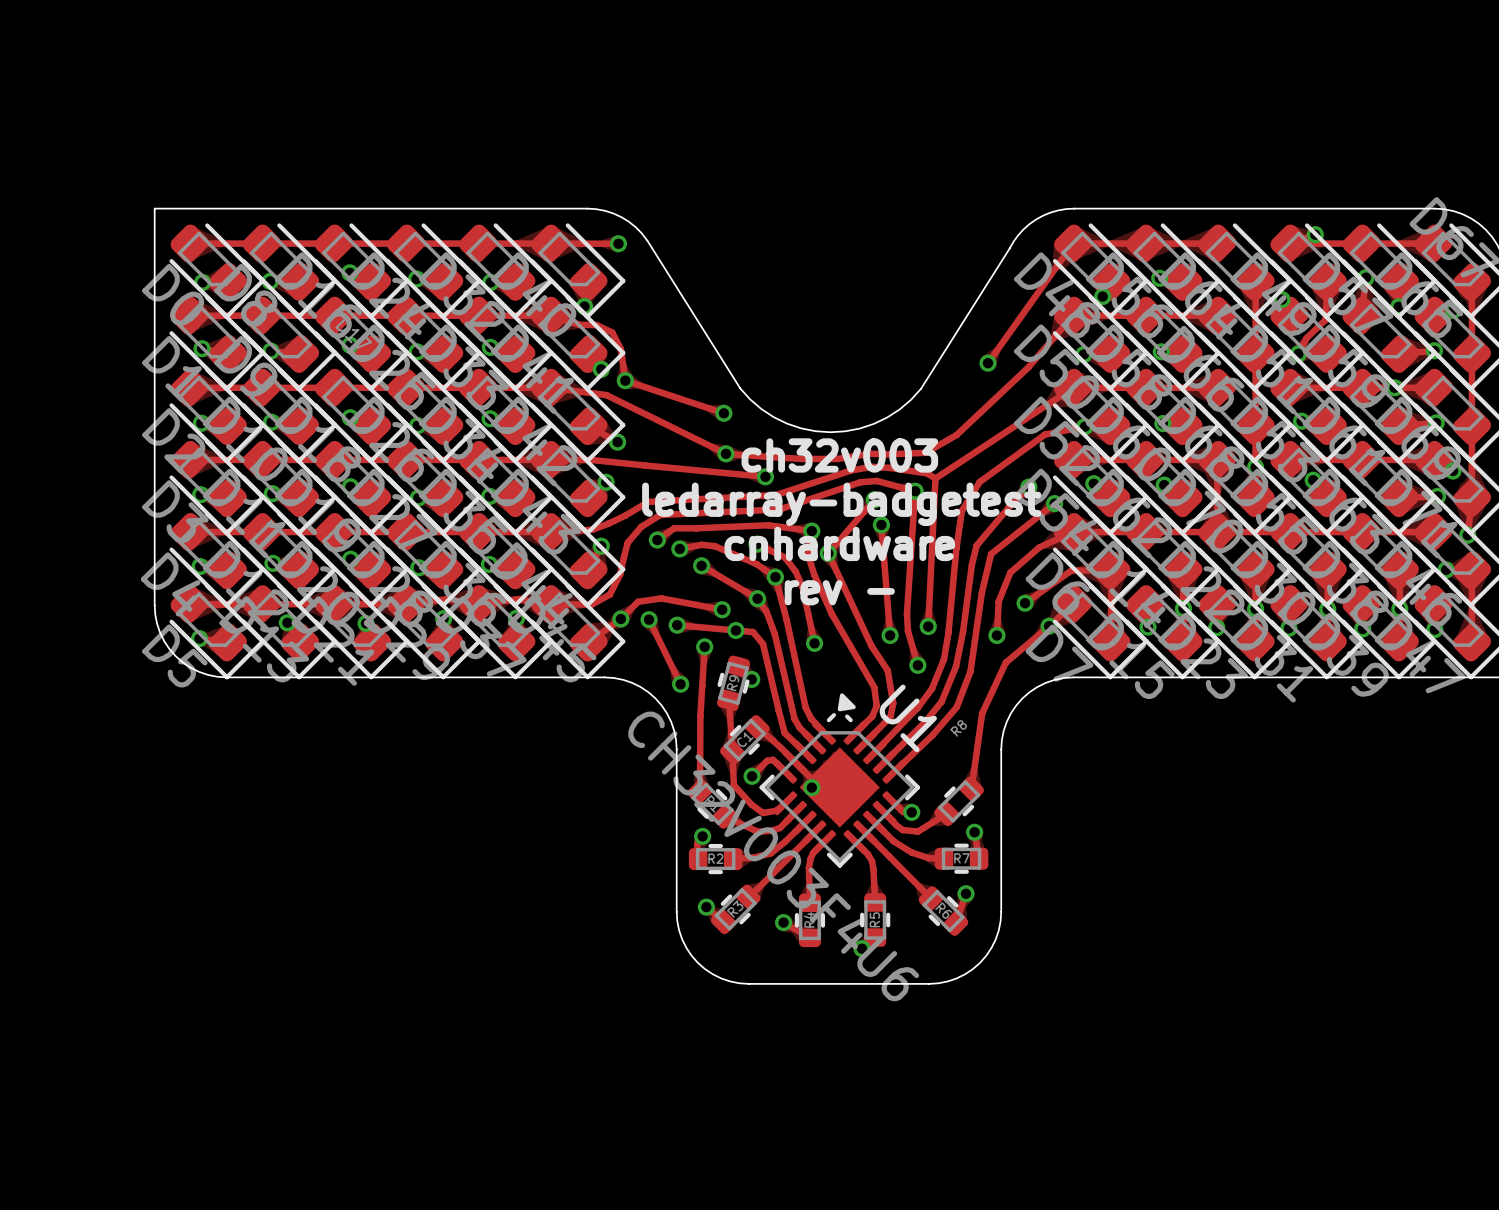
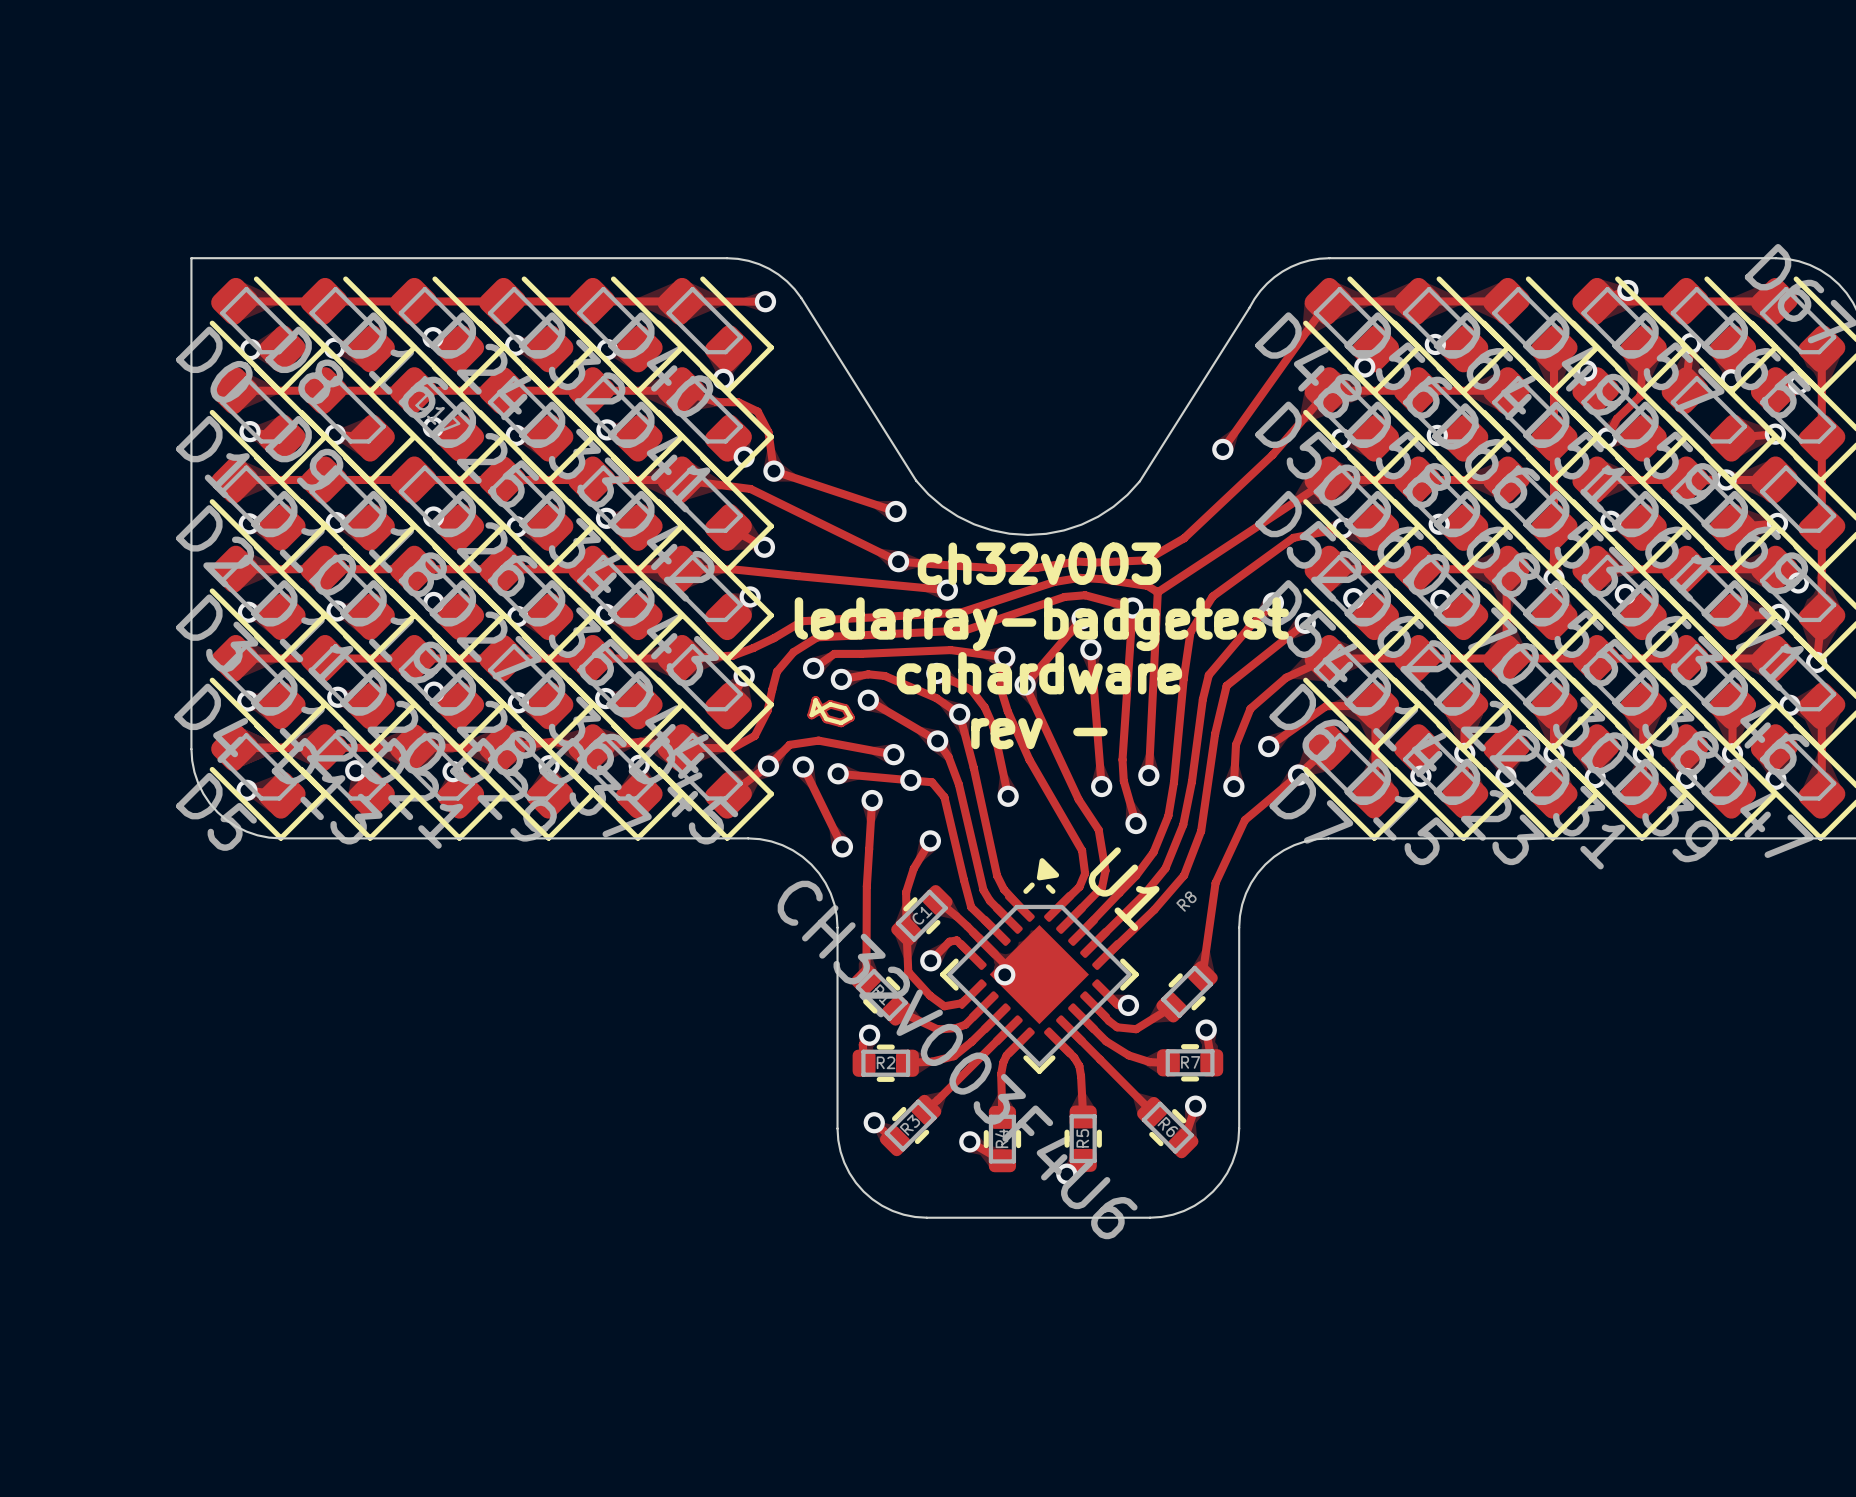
track: none -> (815, 700) (811, 715) (830, 704) (845, 708) (850, 717) (841, 723) (826, 719) (815, 700)
line: none -> (815, 700) (826, 719) (841, 723) (850, 717) (845, 708) (830, 704) (811, 715) (815, 700)
R9: (733, 683) -> none
track: (728, 700) (732, 752) -> (930, 840) (913, 868) (906, 892) (906, 931)

